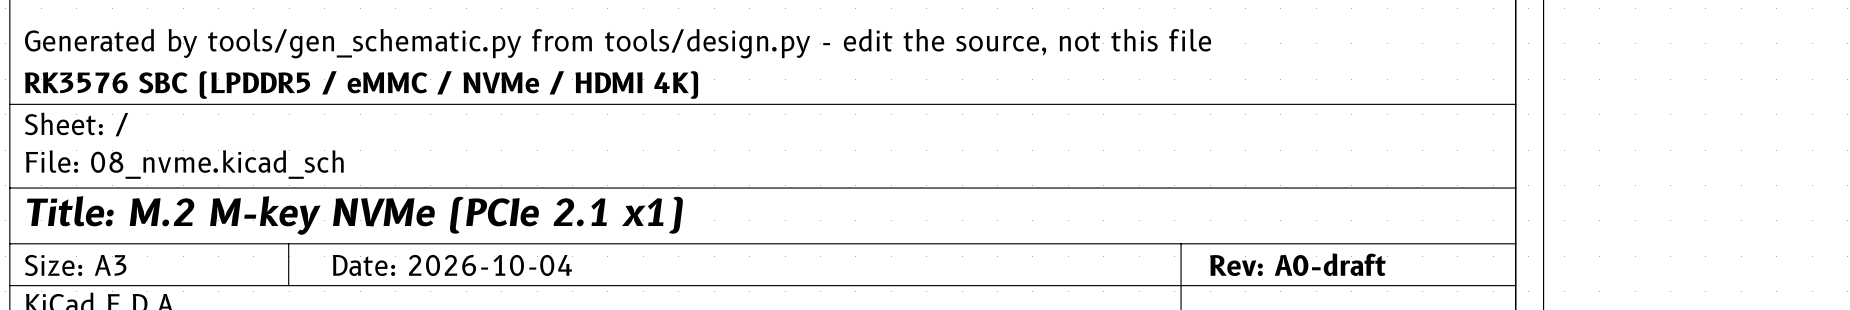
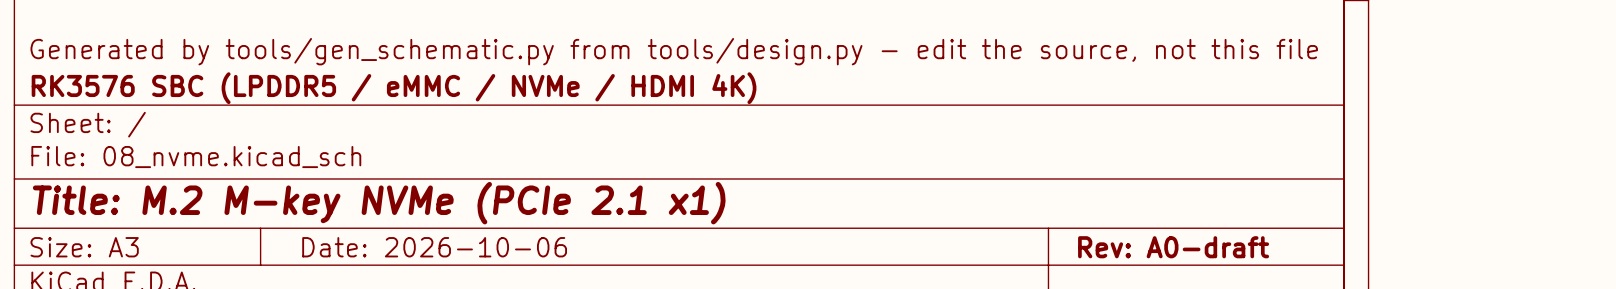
title block: Date: 2026-10-04 (452, 265) -> Date: 2026-10-06 (434, 247)

